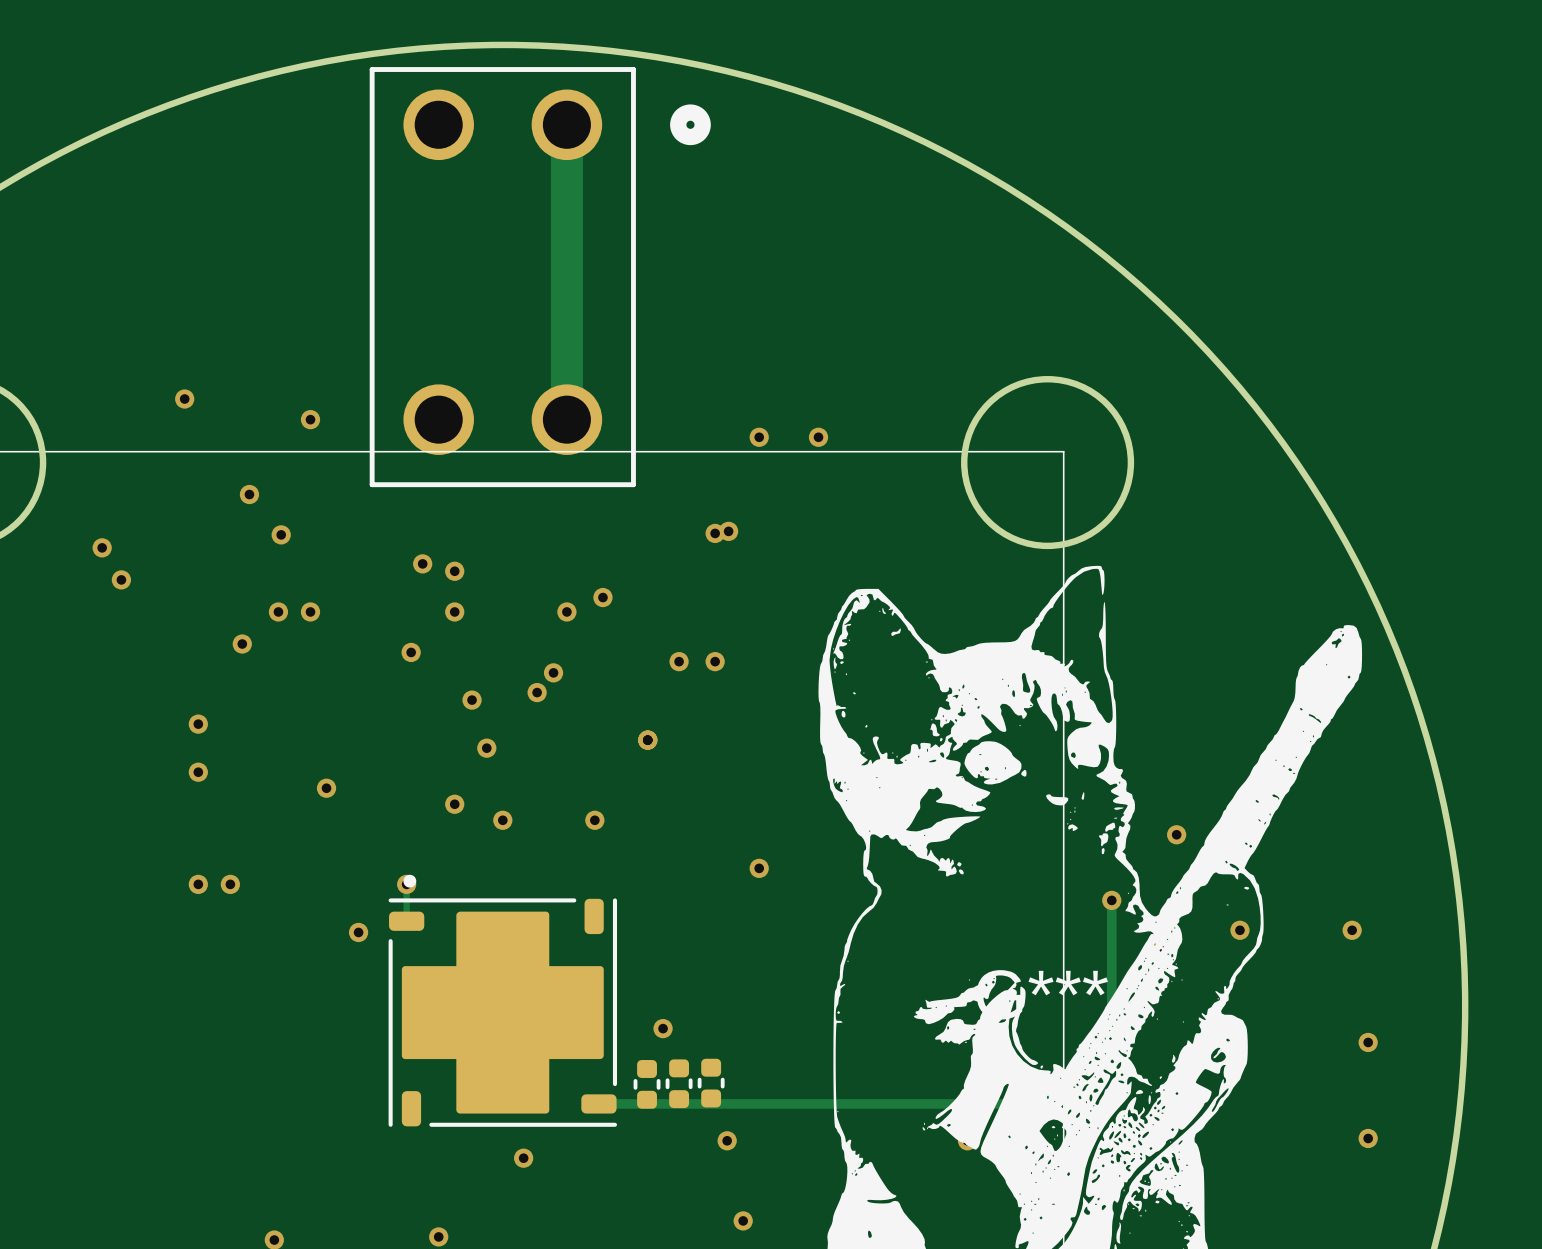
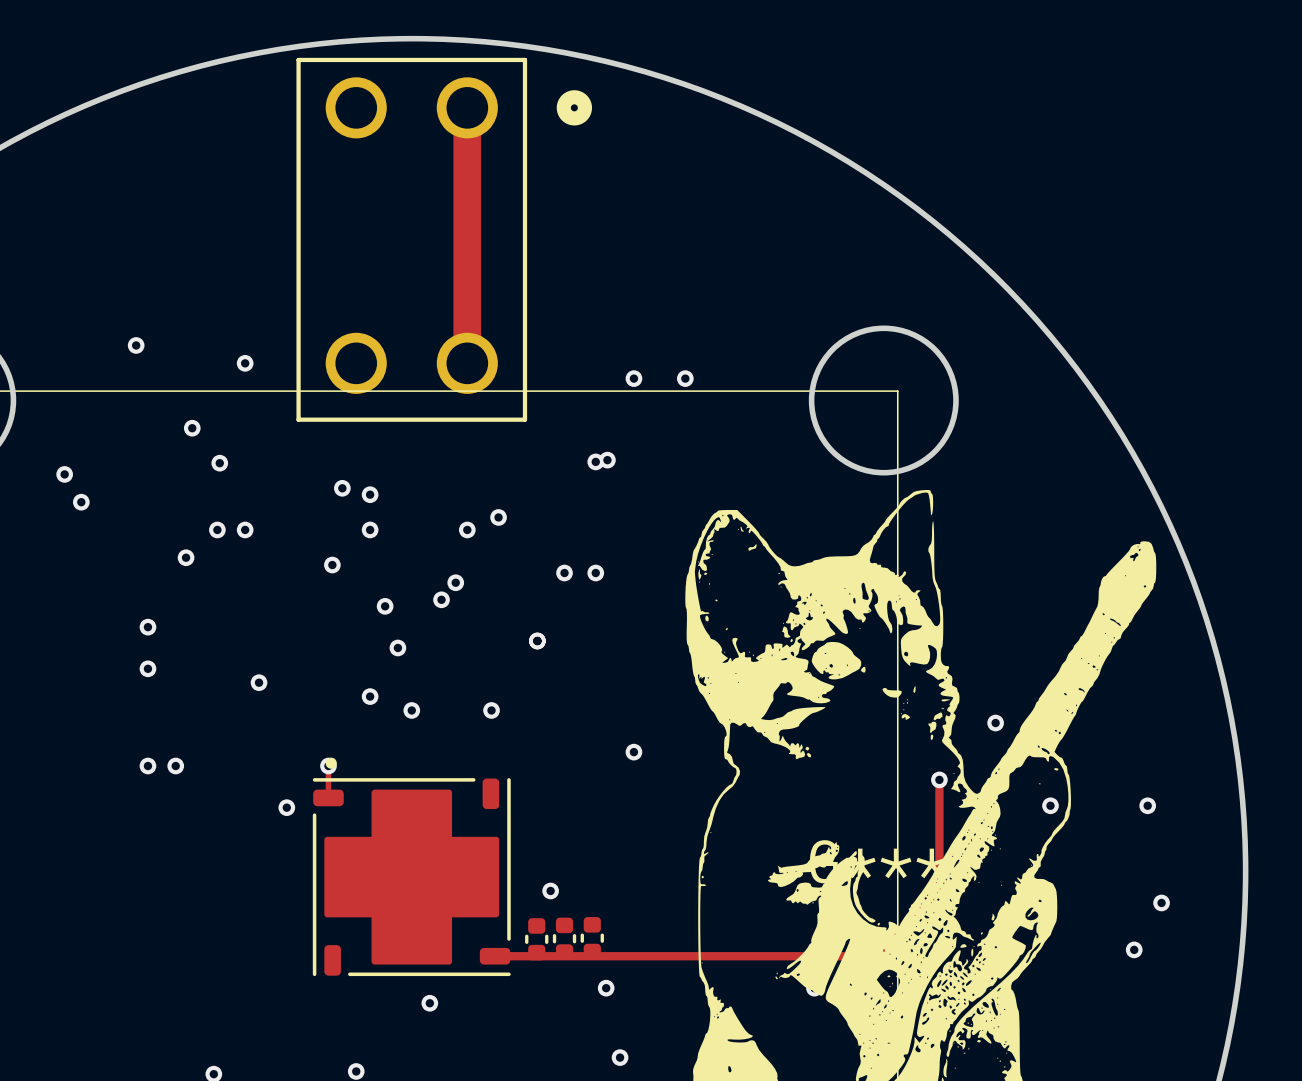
via position: (1368, 1138) -> (1134, 949)

